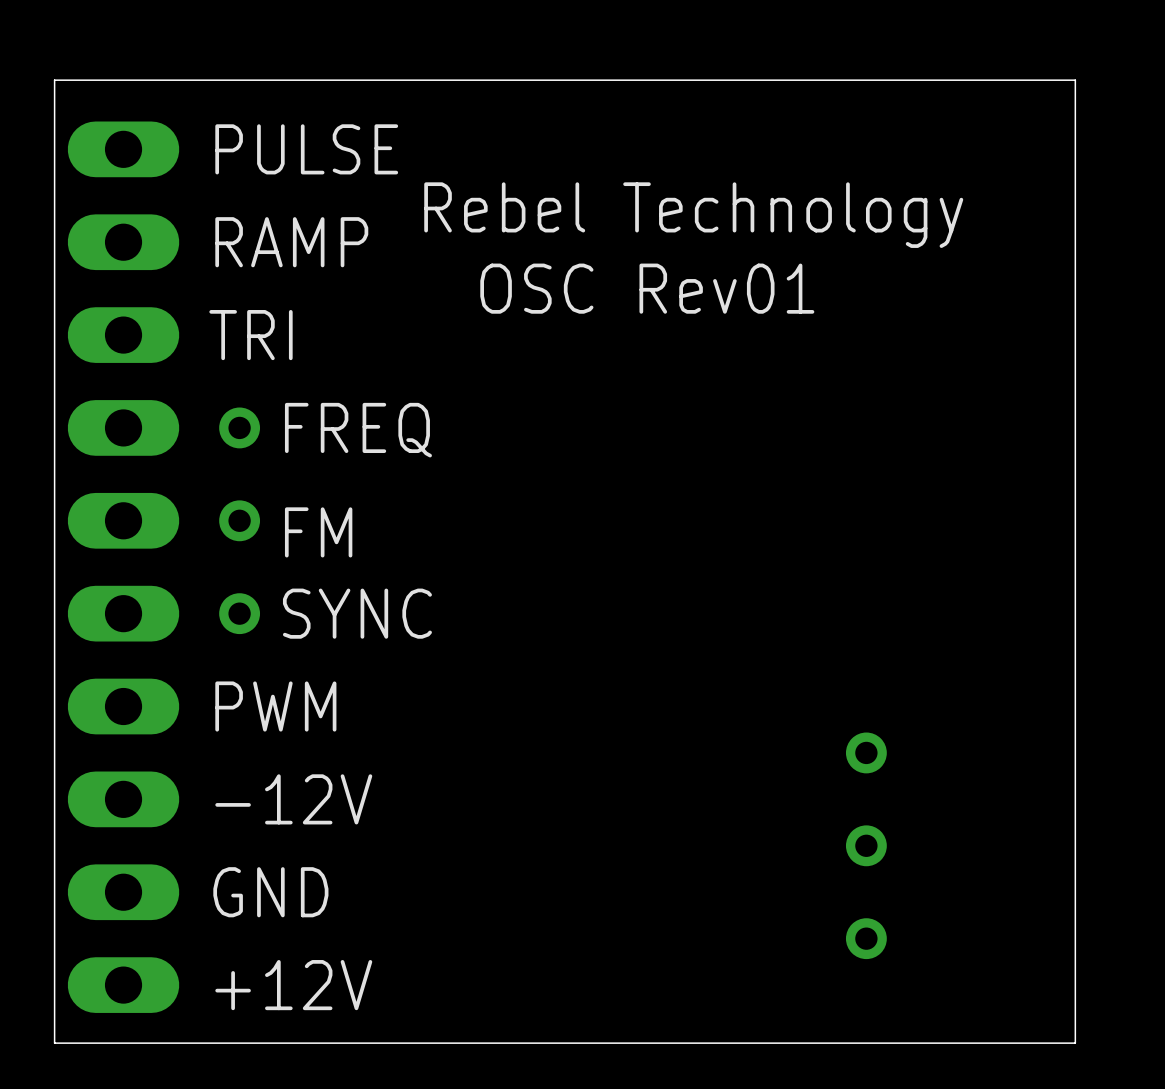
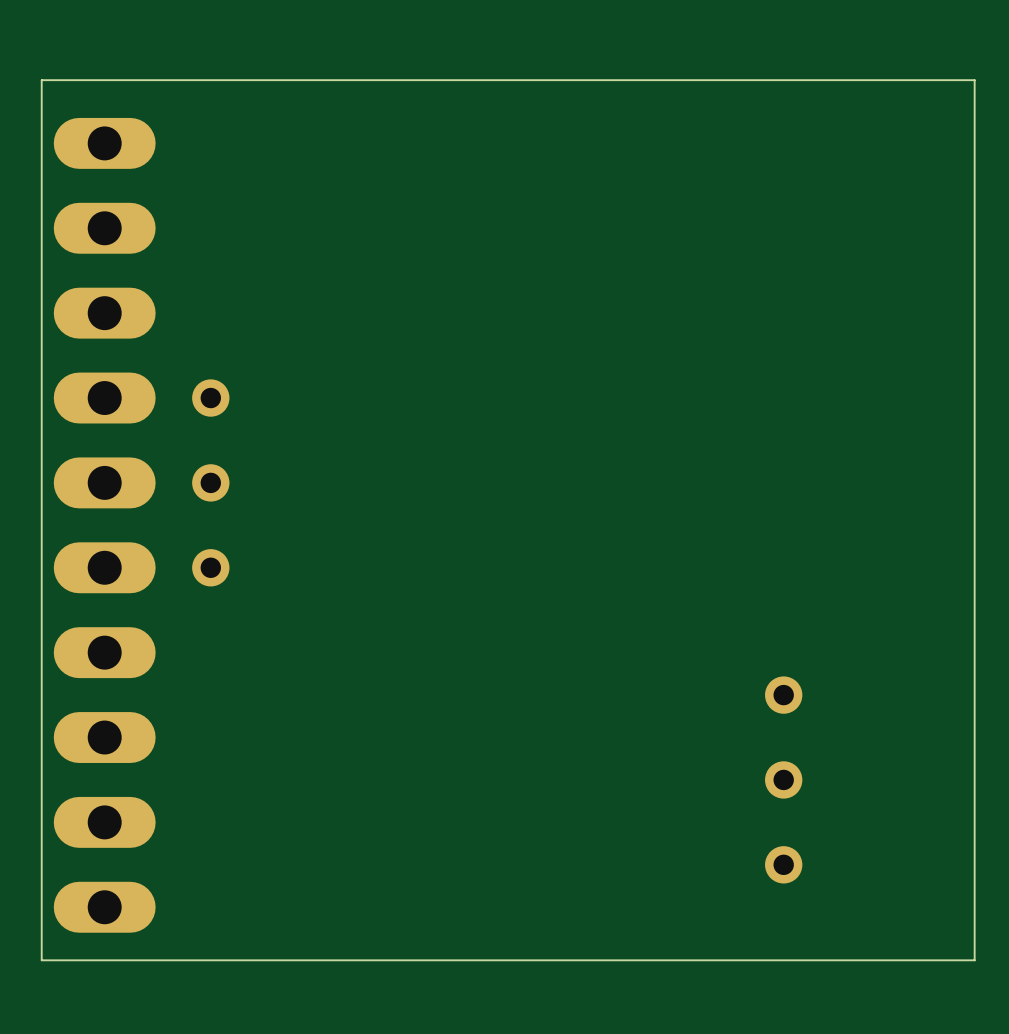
text: PULSE (306, 149) -> none
text: Rebel Technology (693, 215) -> none
text: RAMP (291, 242) -> none
text: OSC Rev01 (647, 288) -> none
text: TRI (250, 335) -> none
text: FREQ (358, 430) -> none
text: FM (318, 532) -> none
text: SYNC (357, 613) -> none
text: PWM (275, 706) -> none
text: -12V (293, 799) -> none
text: GND (270, 892) -> none
text: +12V (293, 985) -> none

